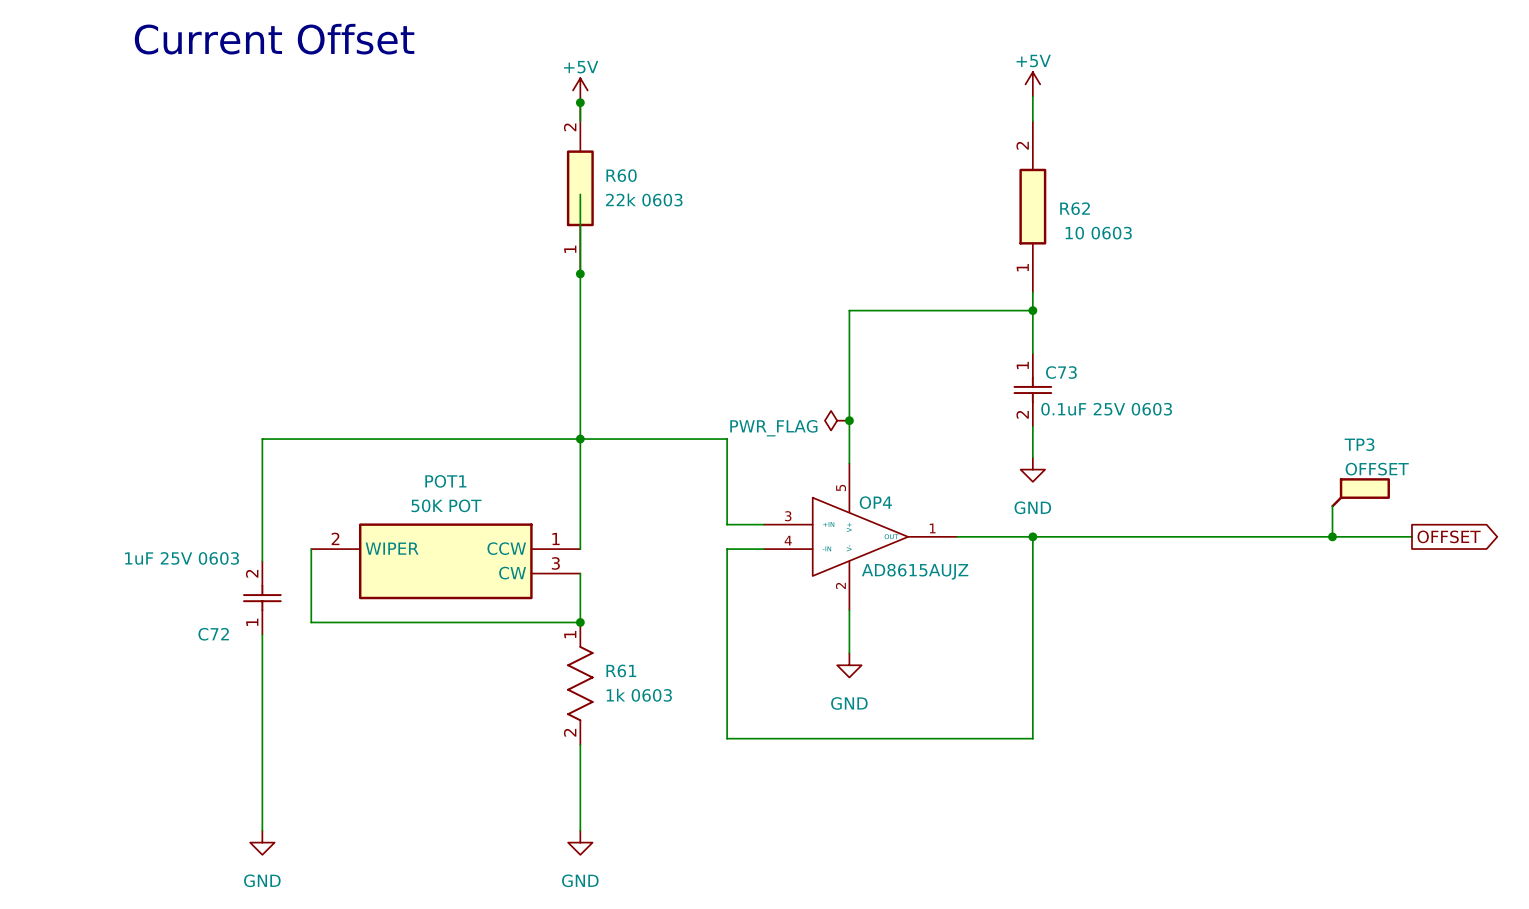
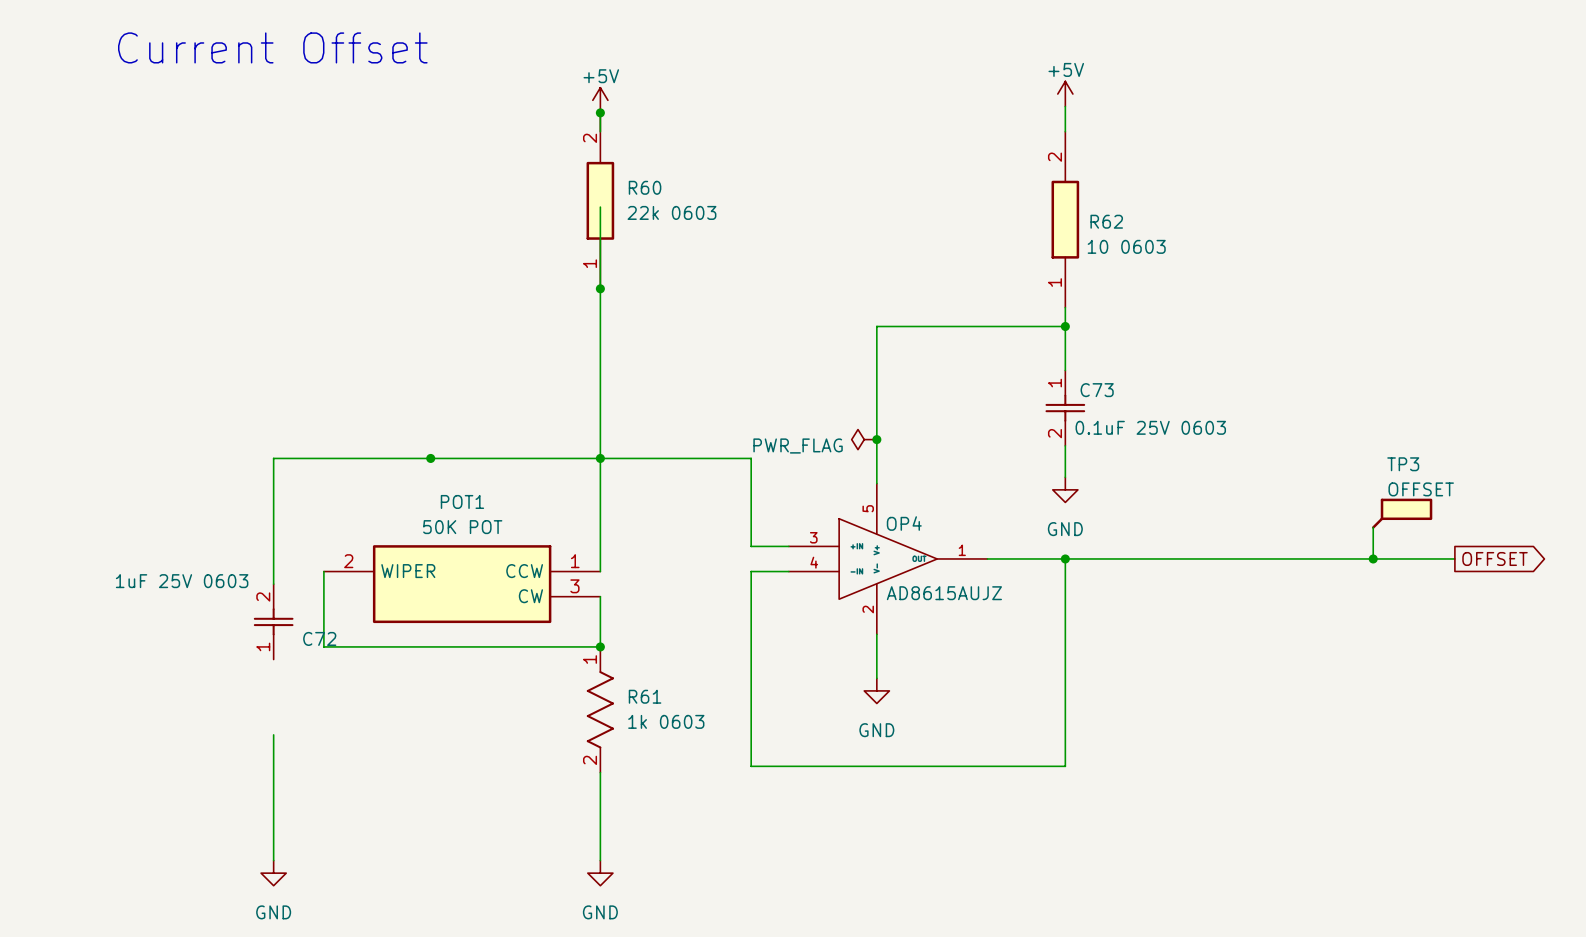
junction: none -> (430, 458)
C72 name position: C72 (213, 634) -> C72 (319, 638)
wire: (262, 634) (262, 708) -> none

